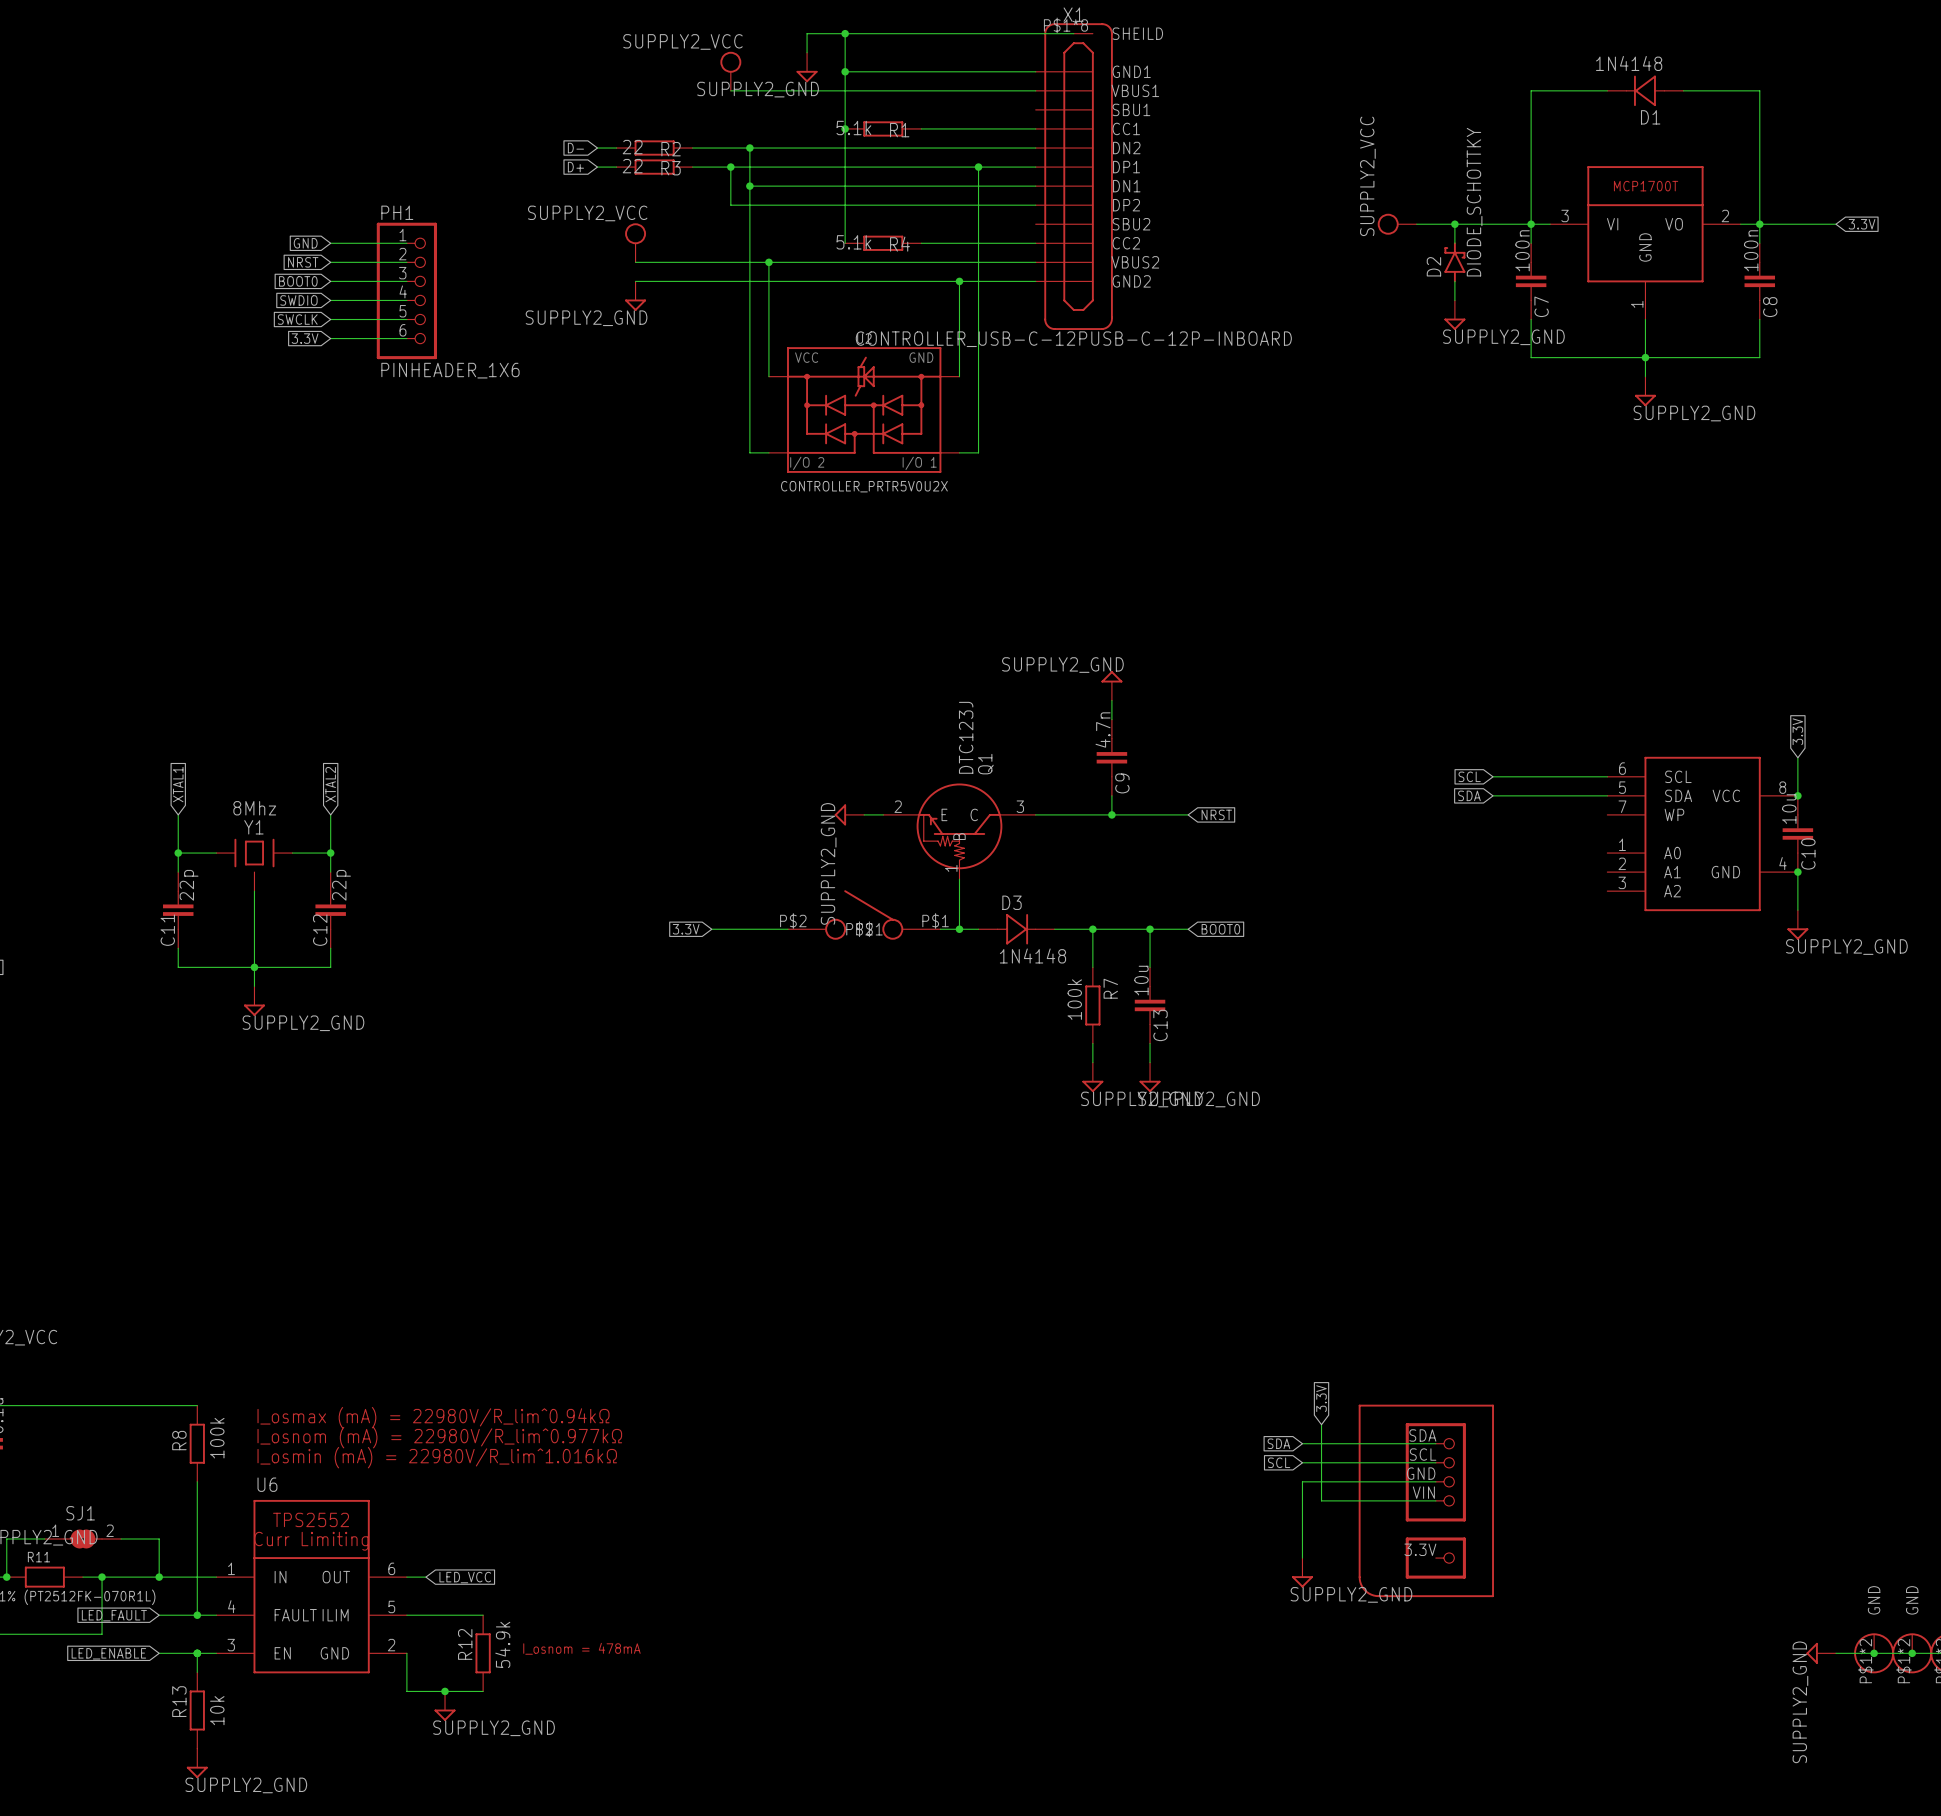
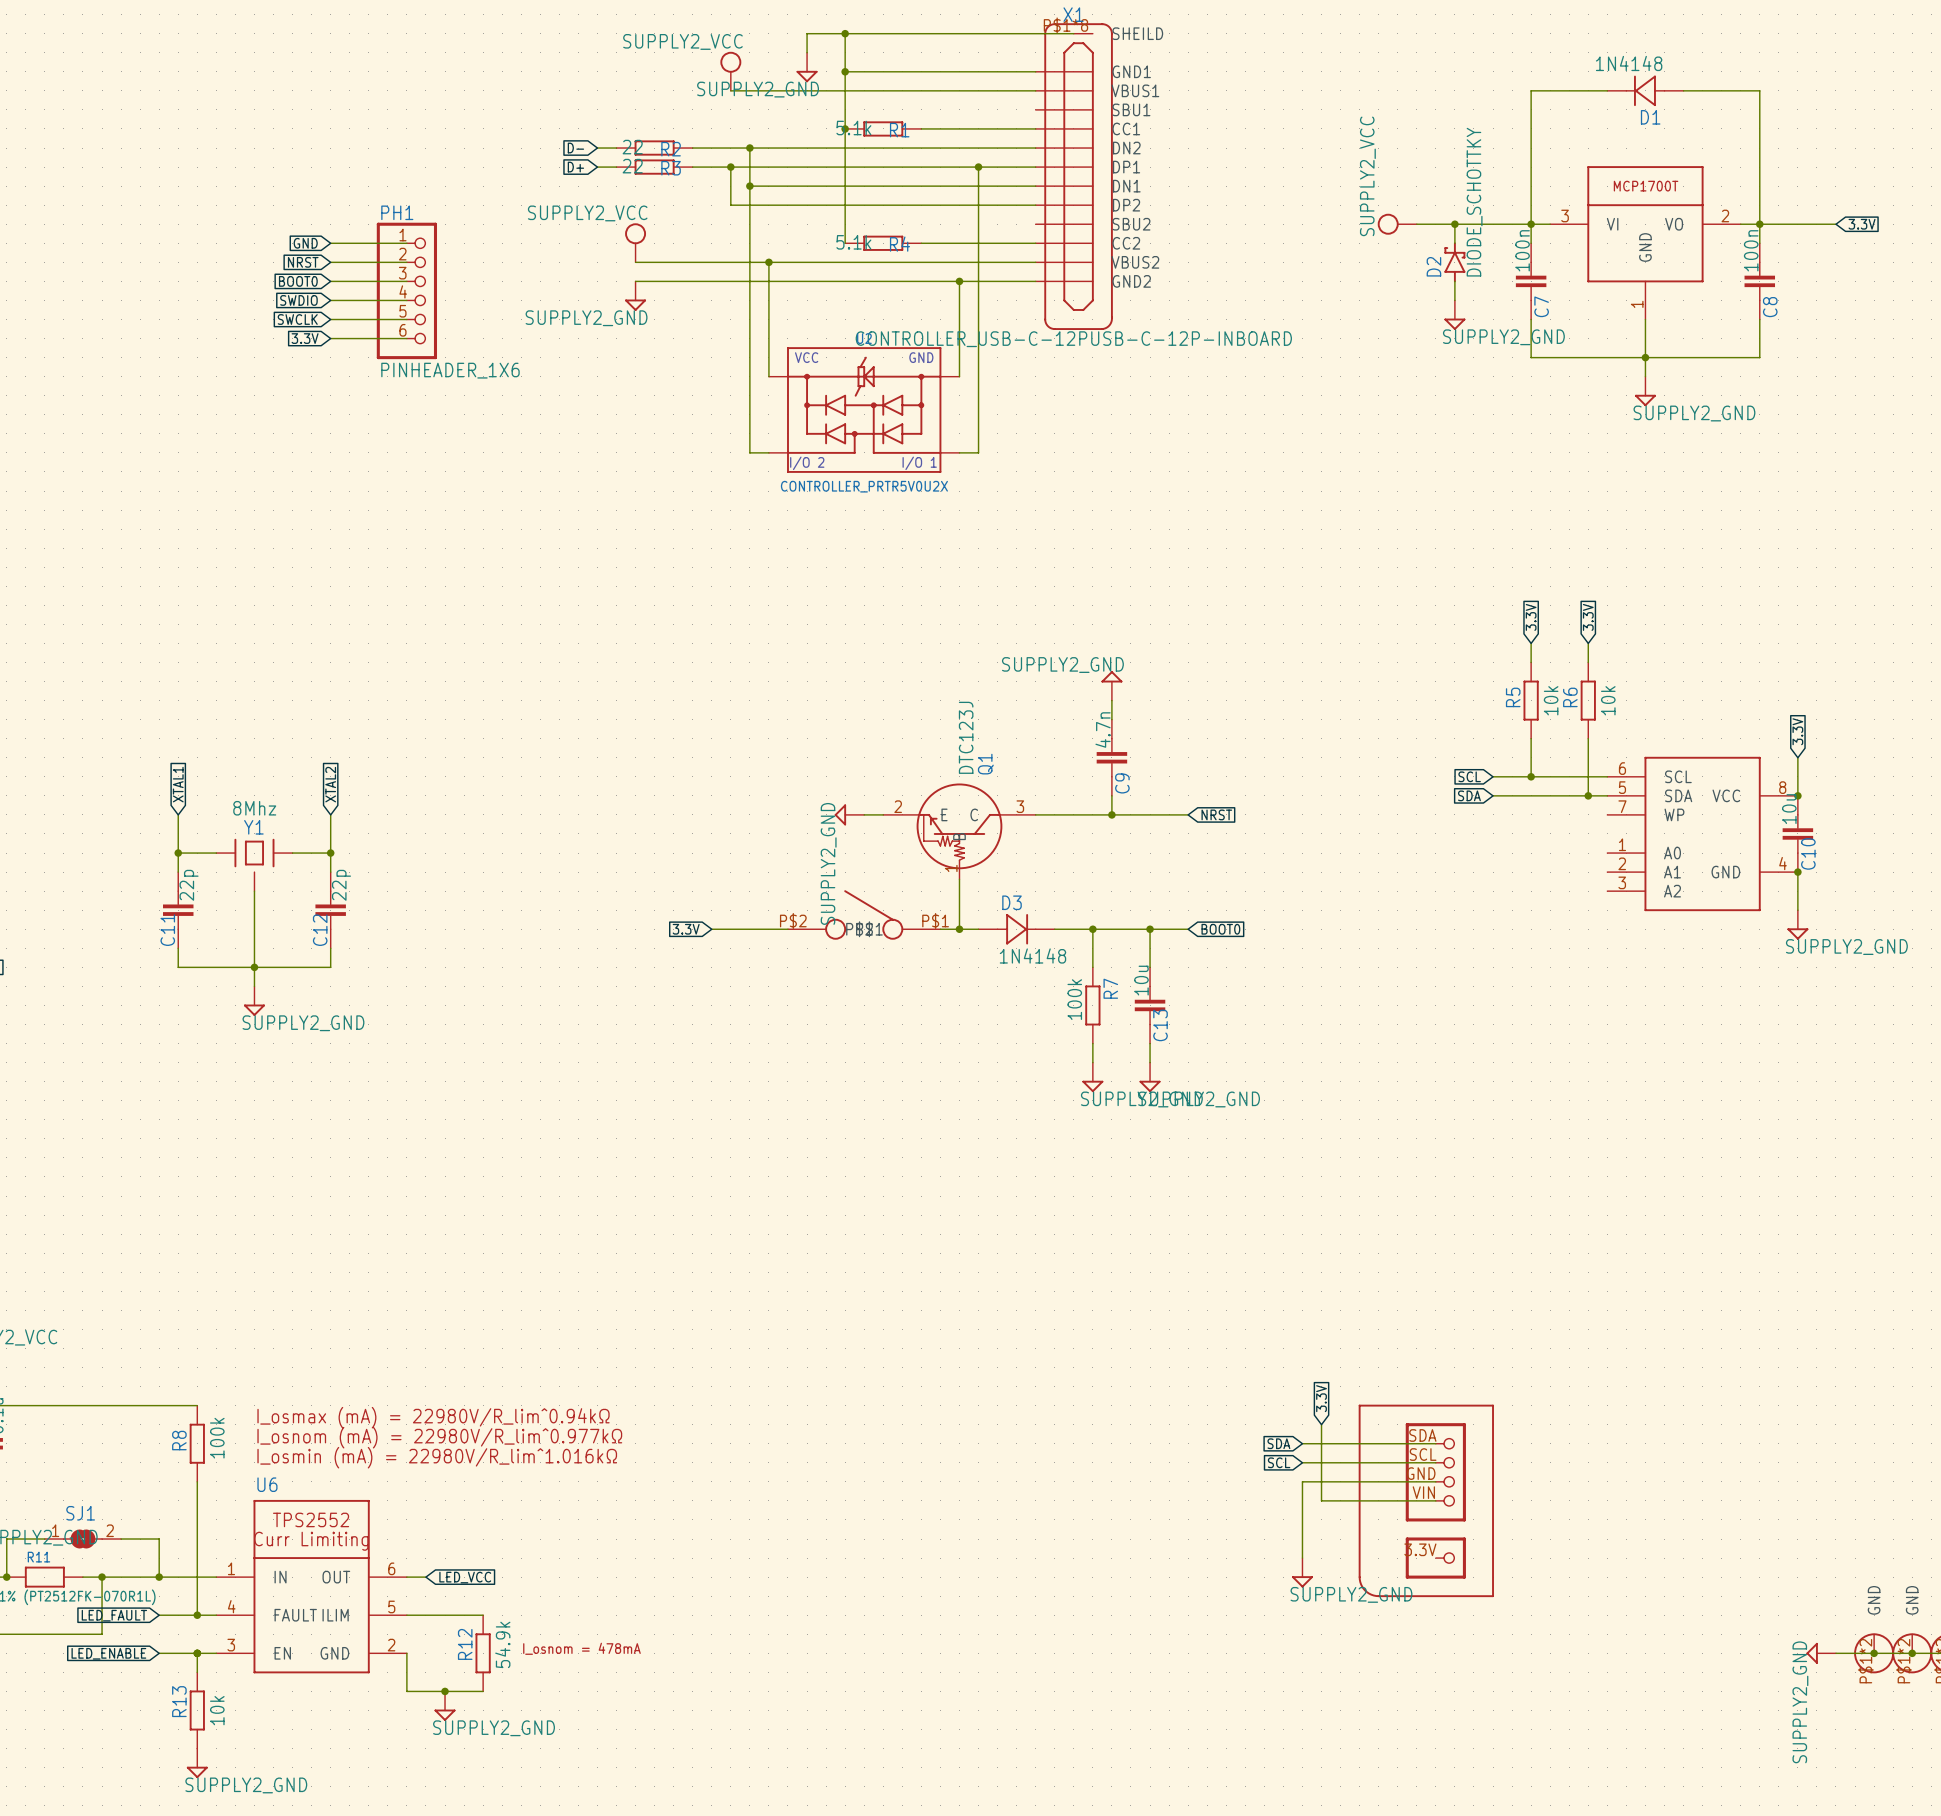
global label: none -> 3.3V (1531, 617)
global label: none -> 3.3V (1588, 617)
wire: none -> (1531, 643) (1531, 662)
wire: none -> (1588, 643) (1588, 662)
R5: none -> 10k (1531, 700)
R6: none -> 10k (1588, 700)
wire: none -> (1531, 738) (1531, 776)
wire: none -> (1588, 738) (1588, 795)
junction: none -> (1531, 776)
junction: none -> (1588, 795)

